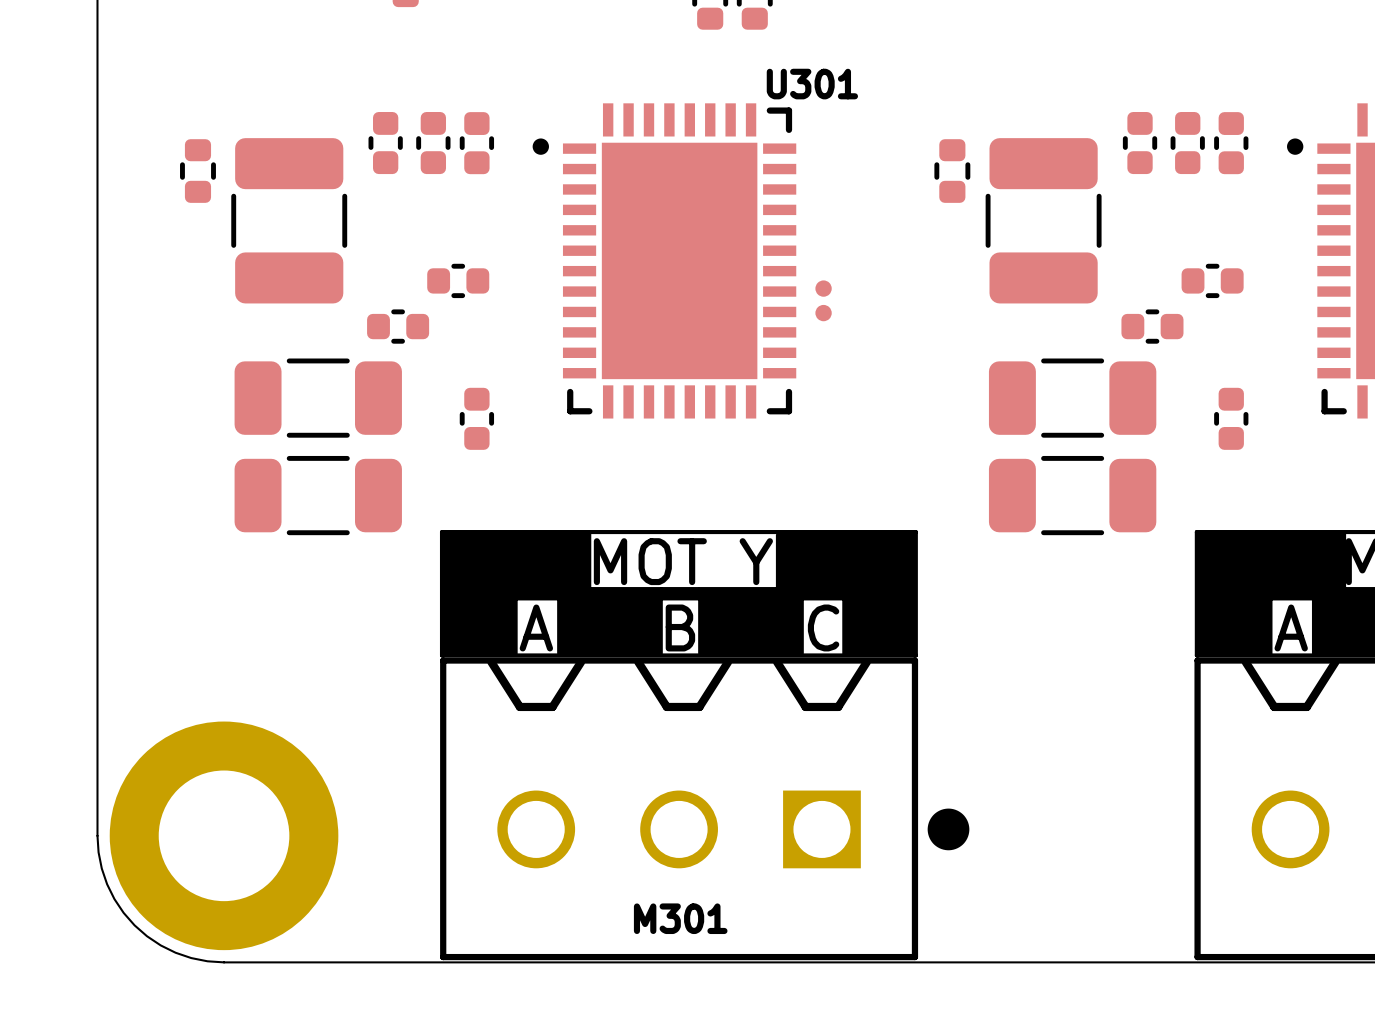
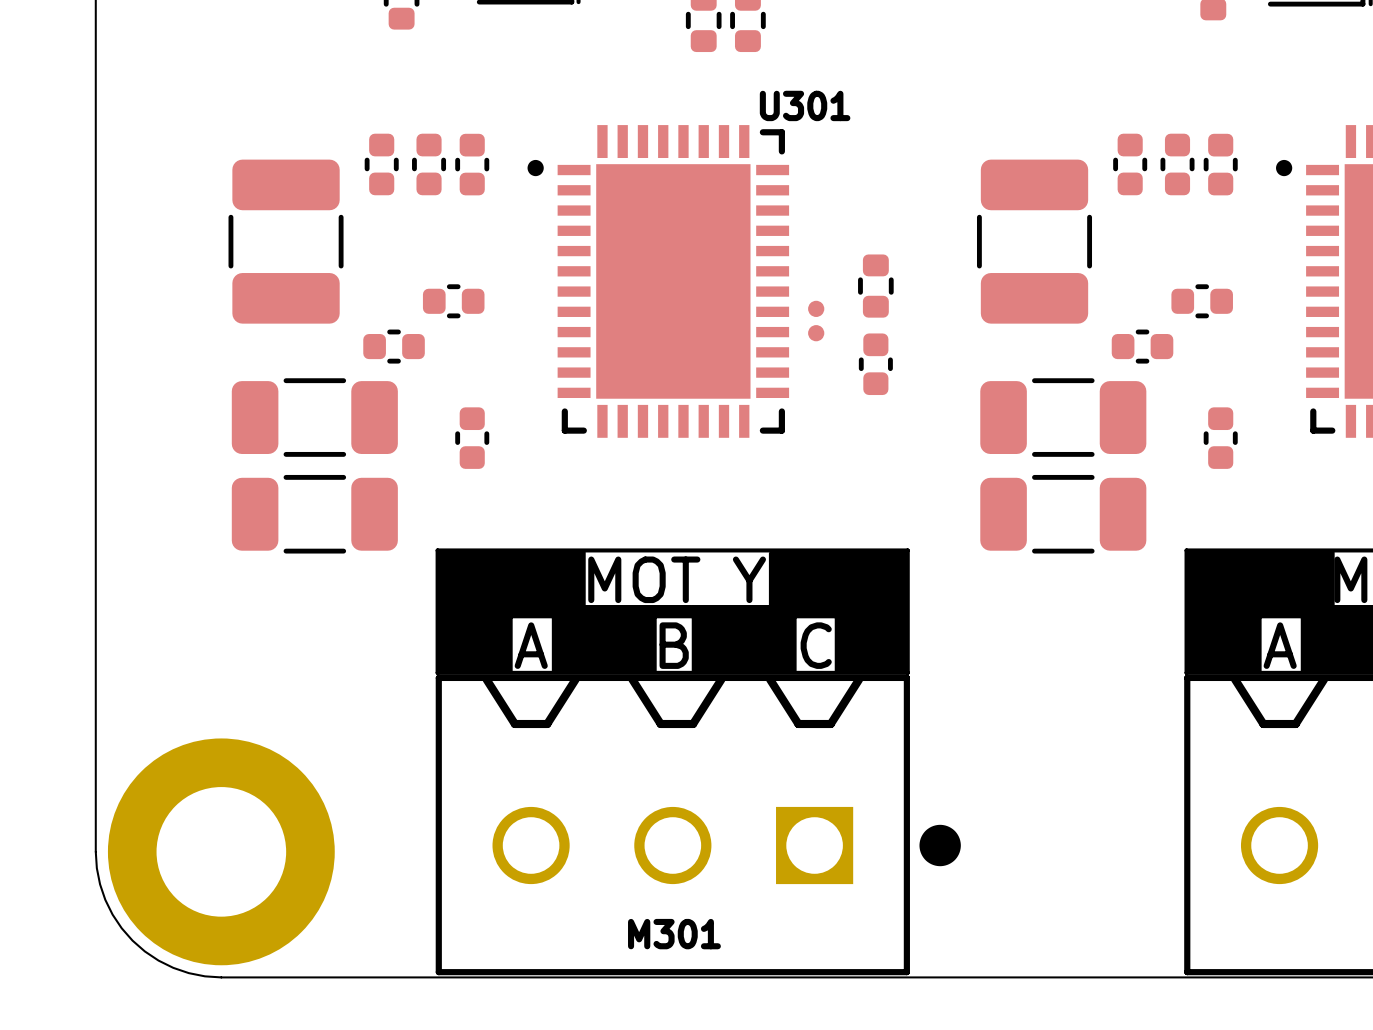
part: (197, 171) -> none
part position: (952, 171) -> (875, 286)
part: none -> (875, 364)

